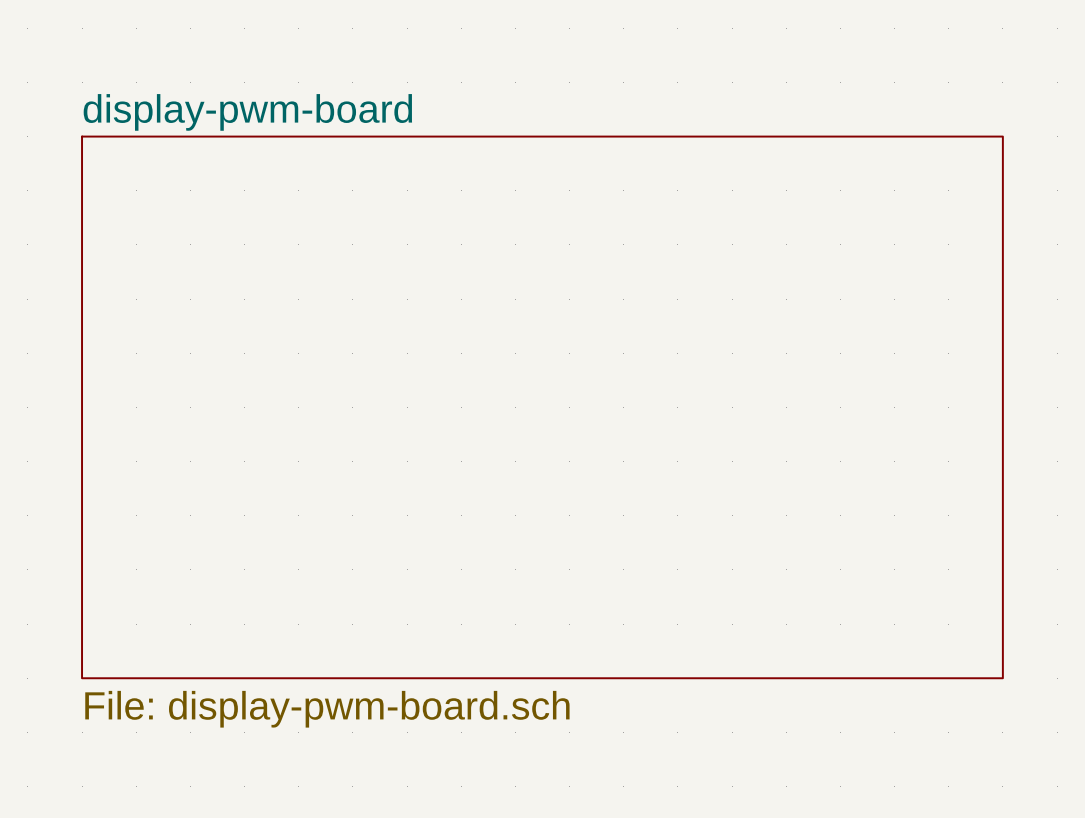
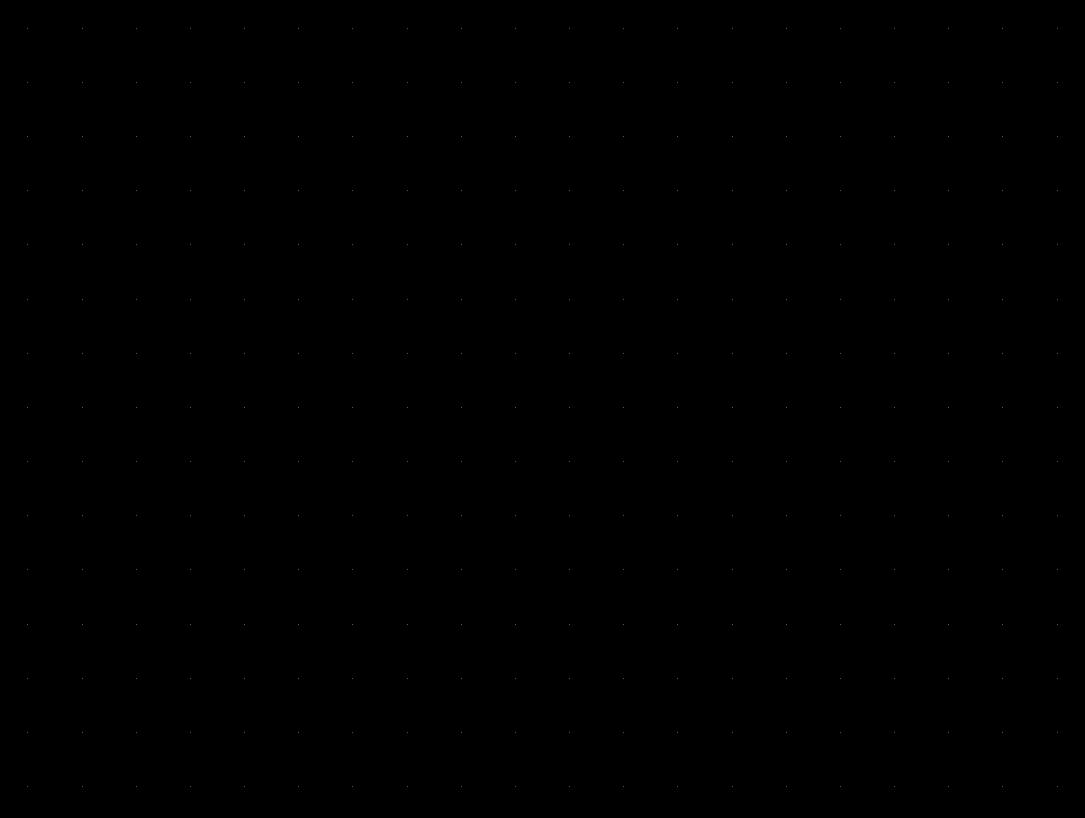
sheet display-pwm-board: File: display-pwm-board.sch (542, 407) -> none

